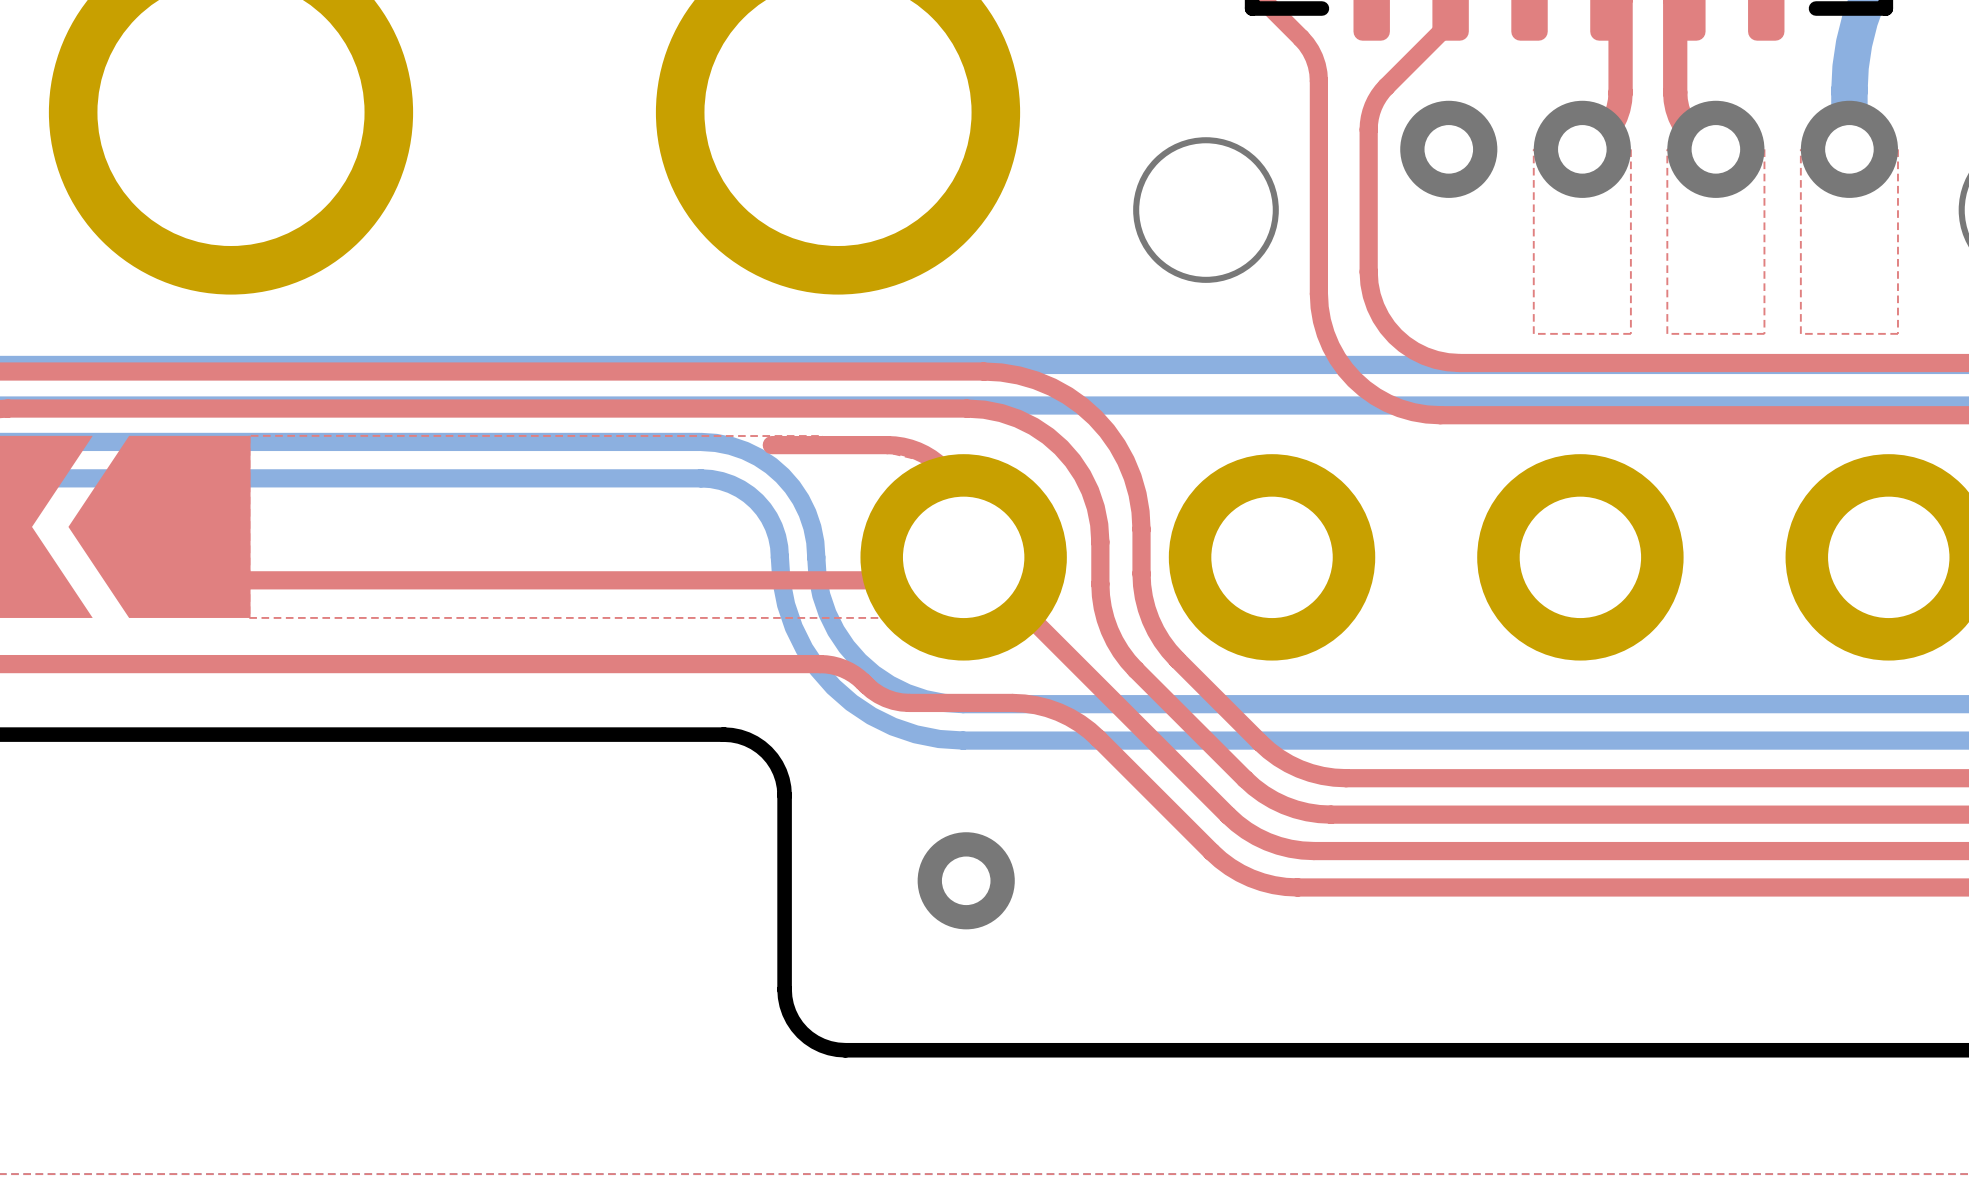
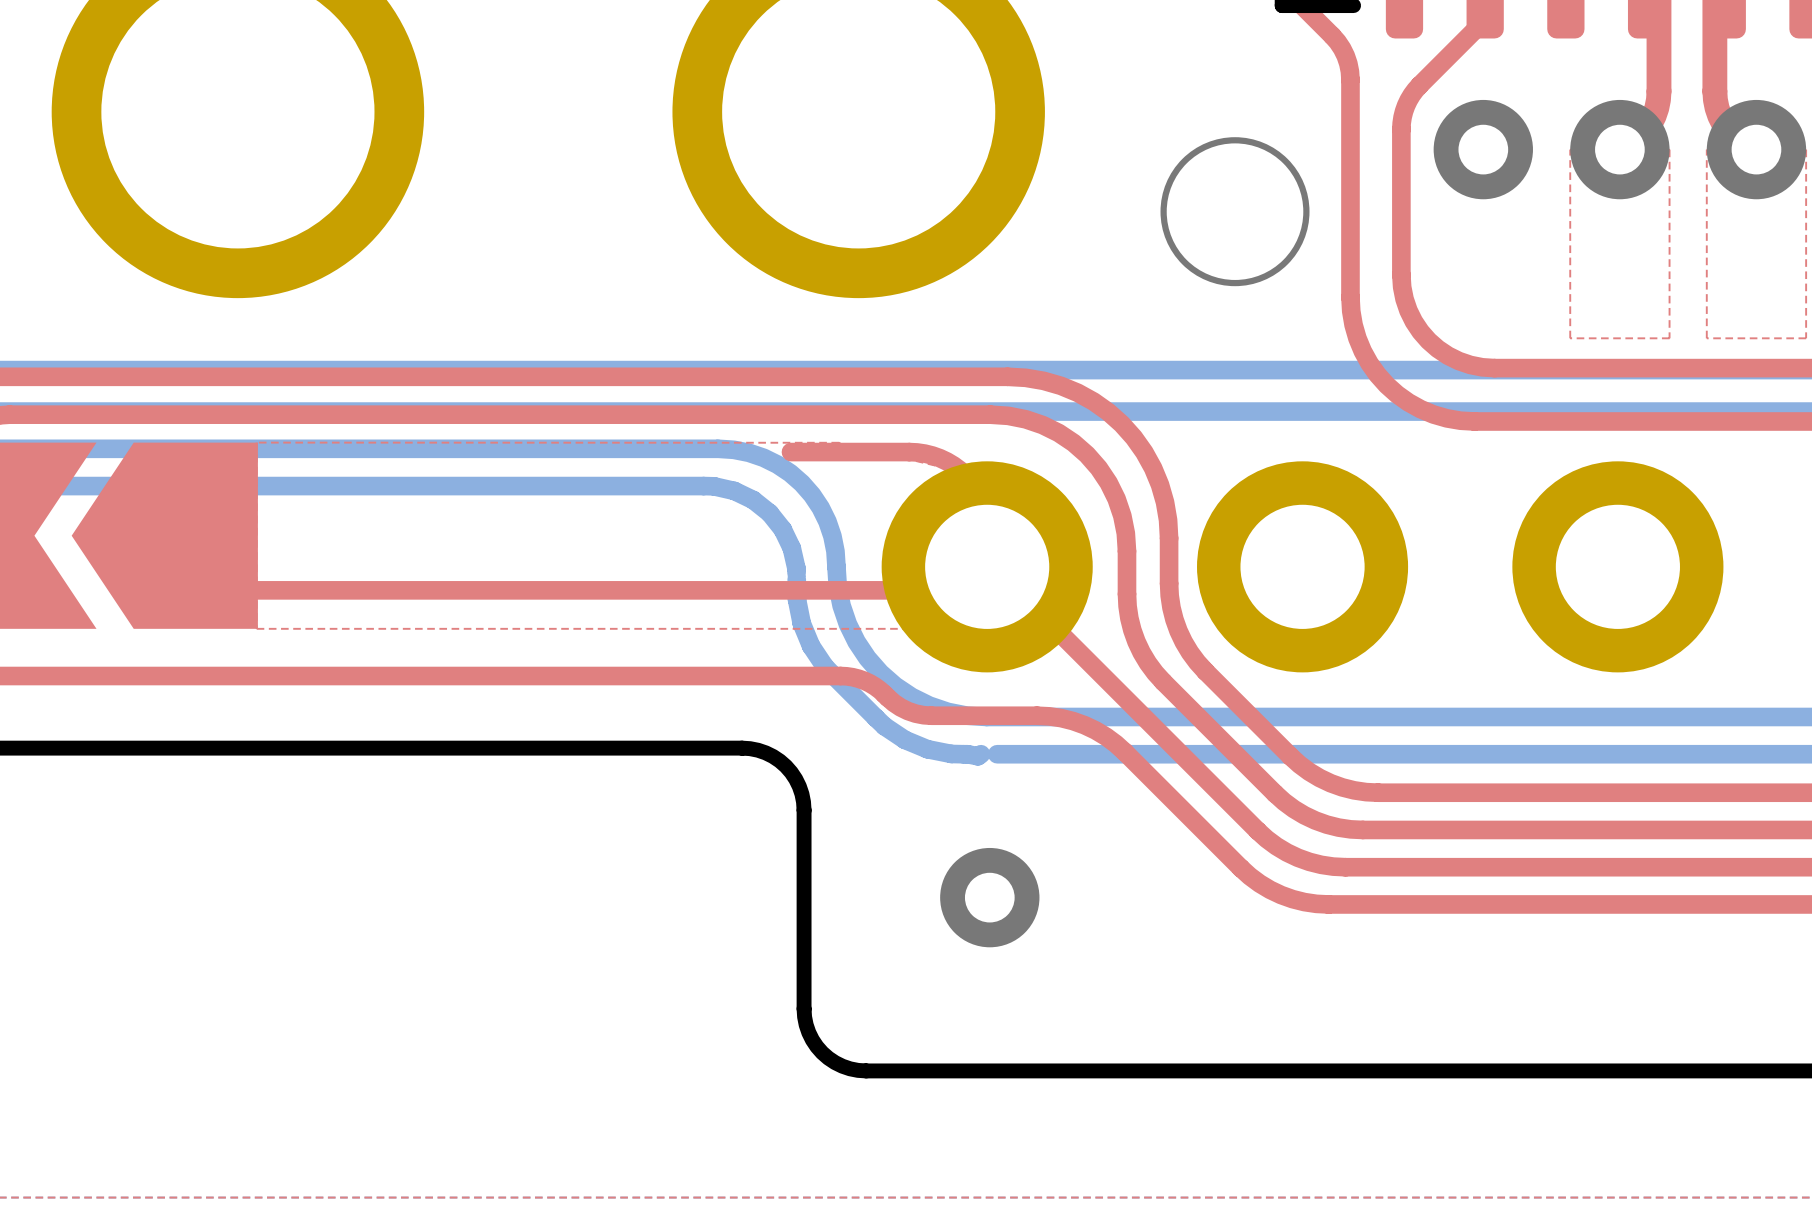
bottom track: (686, 478) (711, 479) (731, 484) (748, 494) (763, 509) (777, 536) (781, 581) (786, 604) (793, 627) (804, 648) (817, 668) (833, 686) (851, 702) (871, 716) (893, 726) (915, 734) (939, 739) (973, 740) -> (703, 486) (734, 490) (753, 500) (769, 513) (782, 529) (791, 548) (796, 573)
bottom track: none -> (796, 579) (796, 599) (801, 623) (811, 646) (824, 666) (884, 726) (904, 739) (927, 749) (951, 753) (977, 756) (980, 754)

